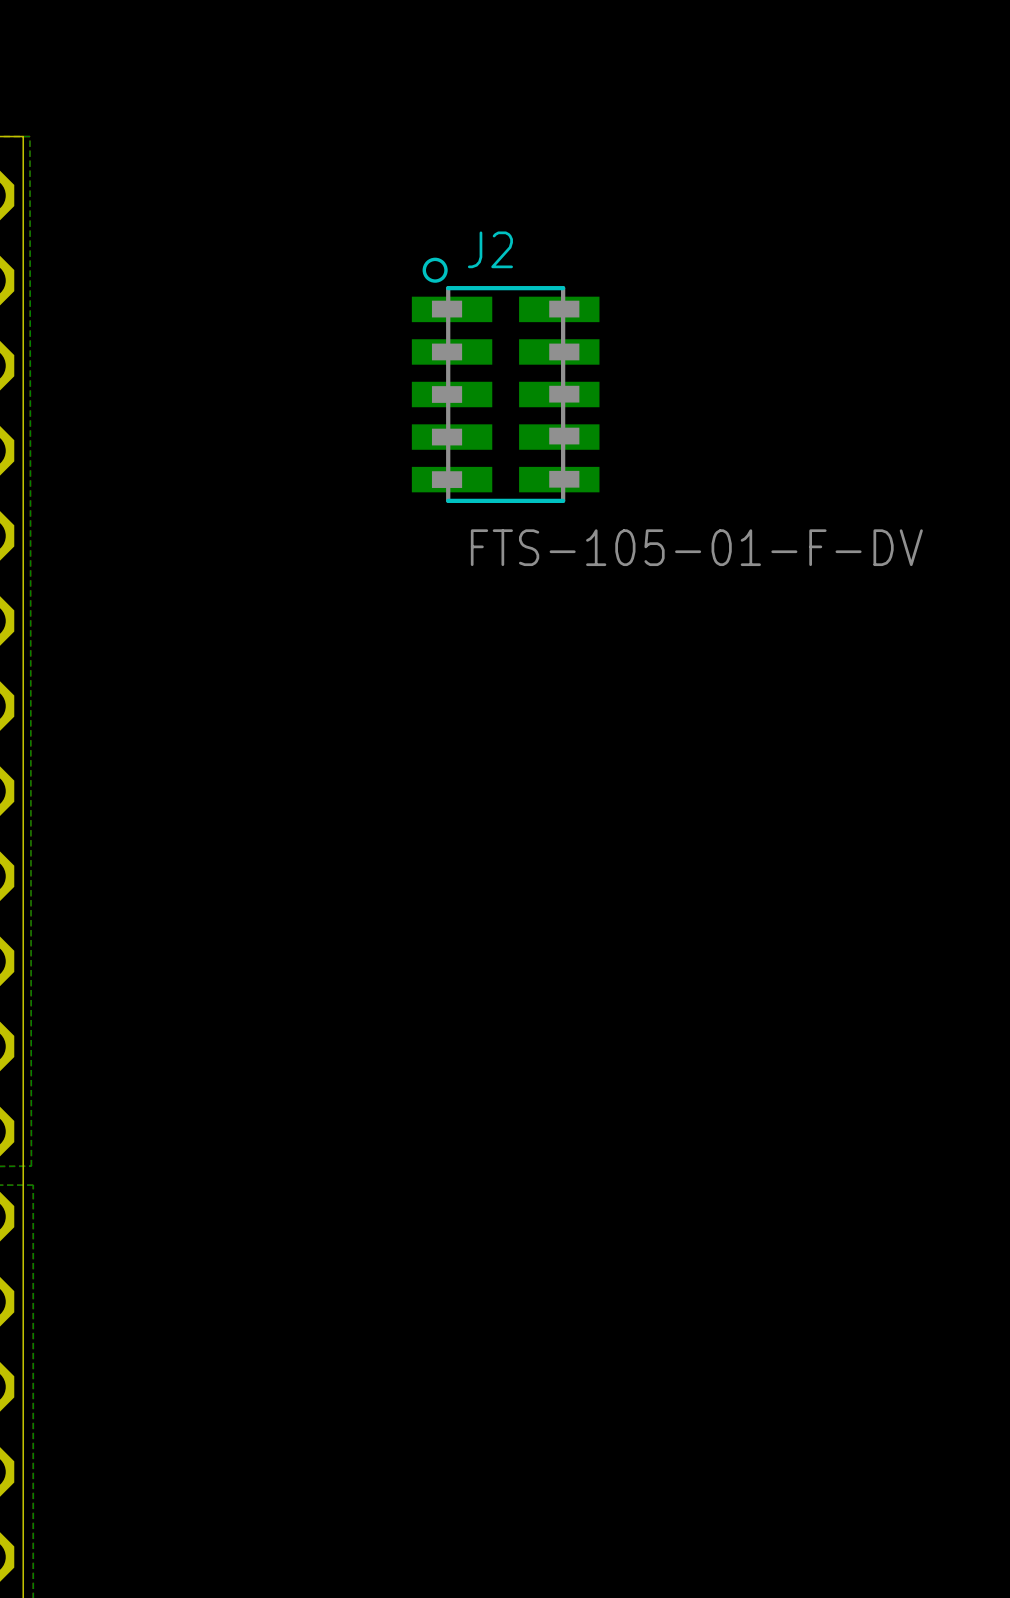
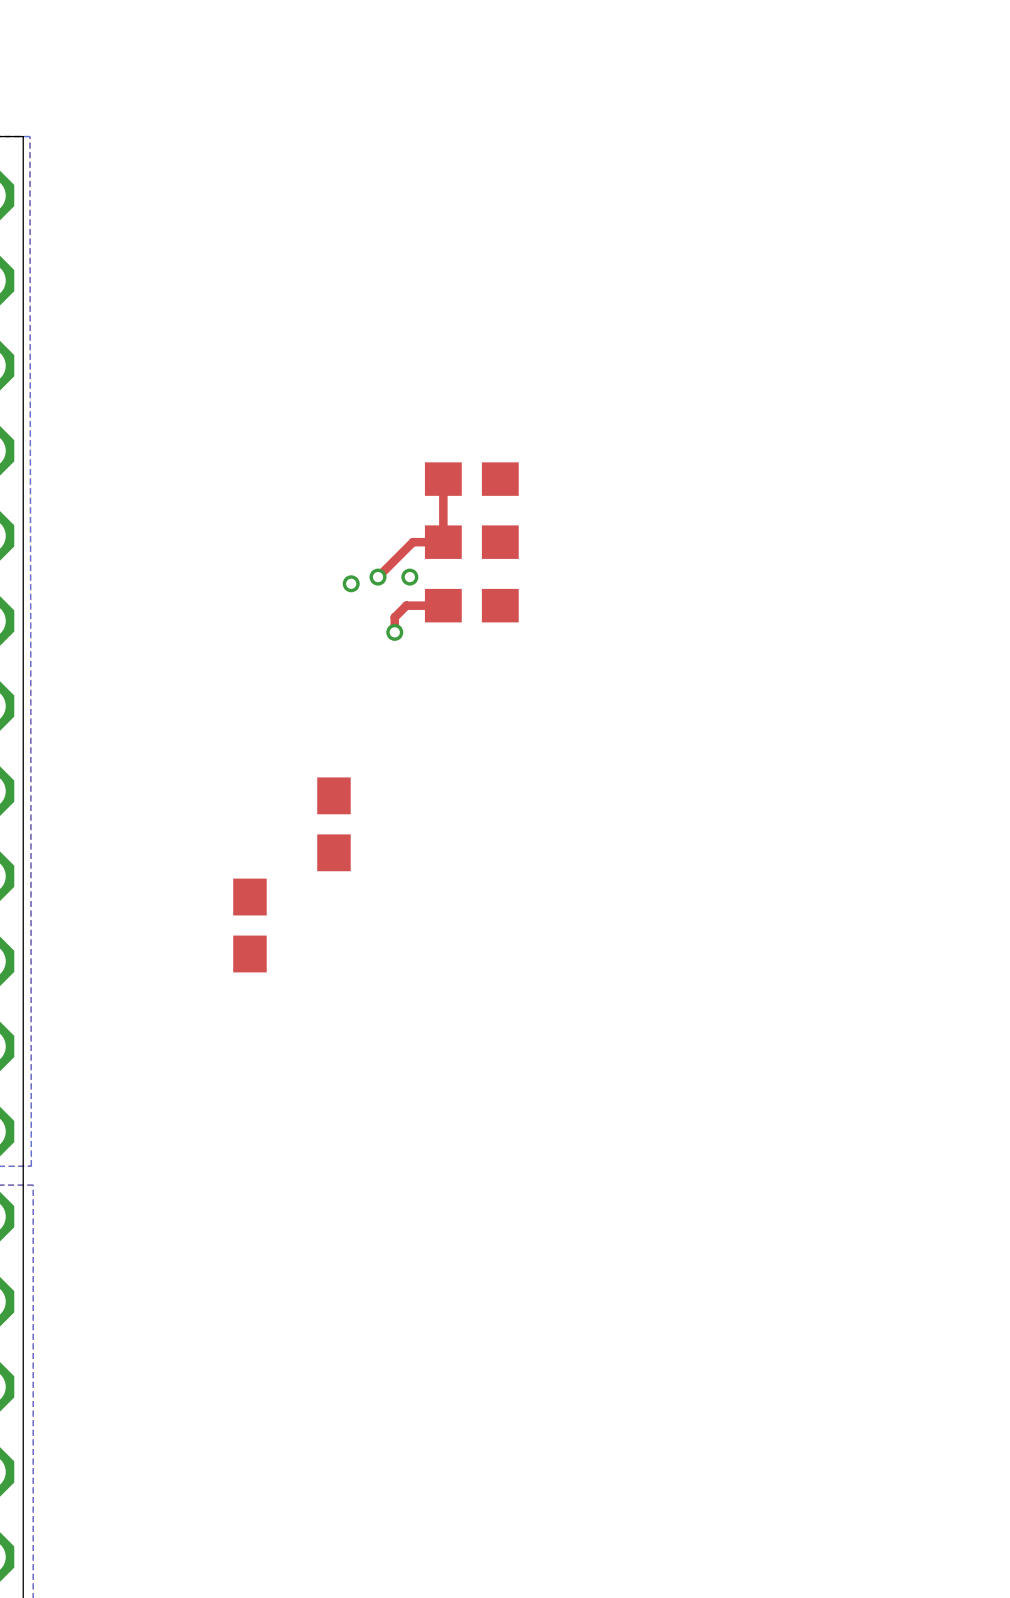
J2: FTS-105-01-F-DV (505, 380) -> none
top track: none -> (443, 479) (443, 542) (412, 542) (377, 579)
part: none -> (471, 479)
part: none -> (471, 542)
via: none -> (378, 577)
via: none -> (409, 577)
via: none -> (351, 583)
top track: none -> (443, 605) (406, 605) (394, 617) (394, 632)
part: none -> (471, 605)
via: none -> (394, 632)
part: none -> (333, 824)
part: none -> (249, 925)

